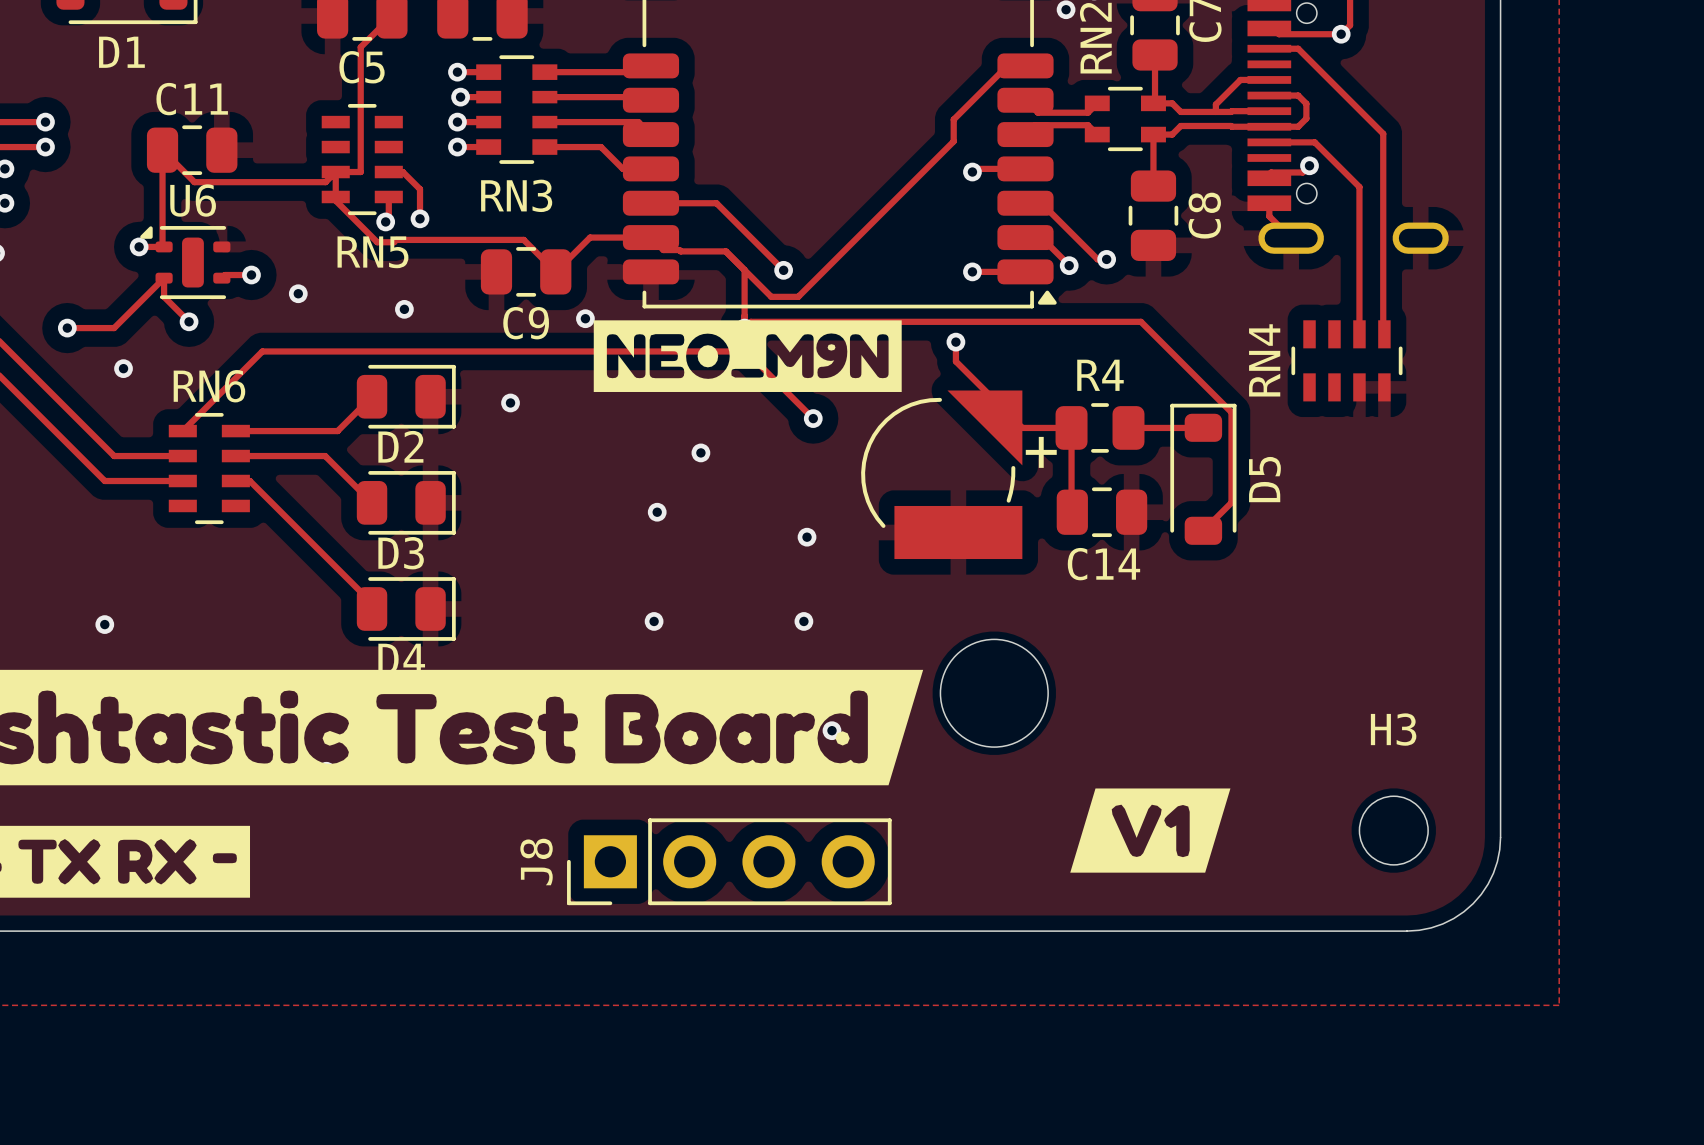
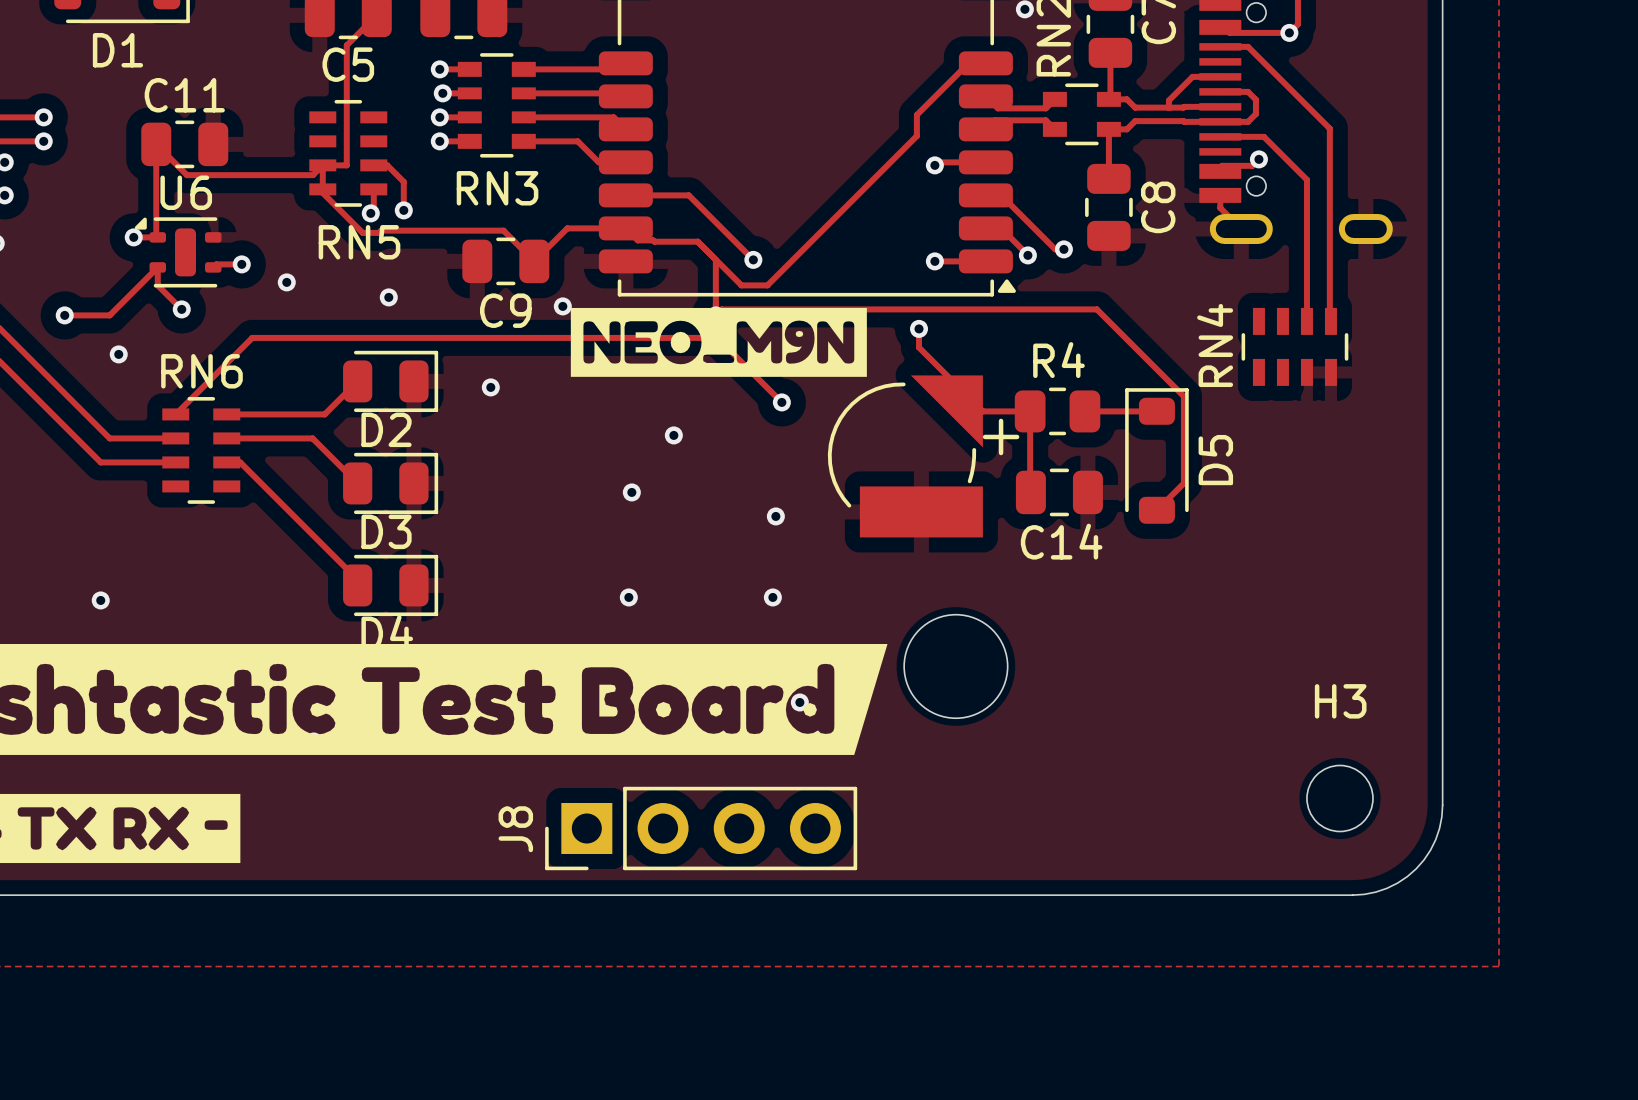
drawing: [1070, 788, 1231, 873] -> none

